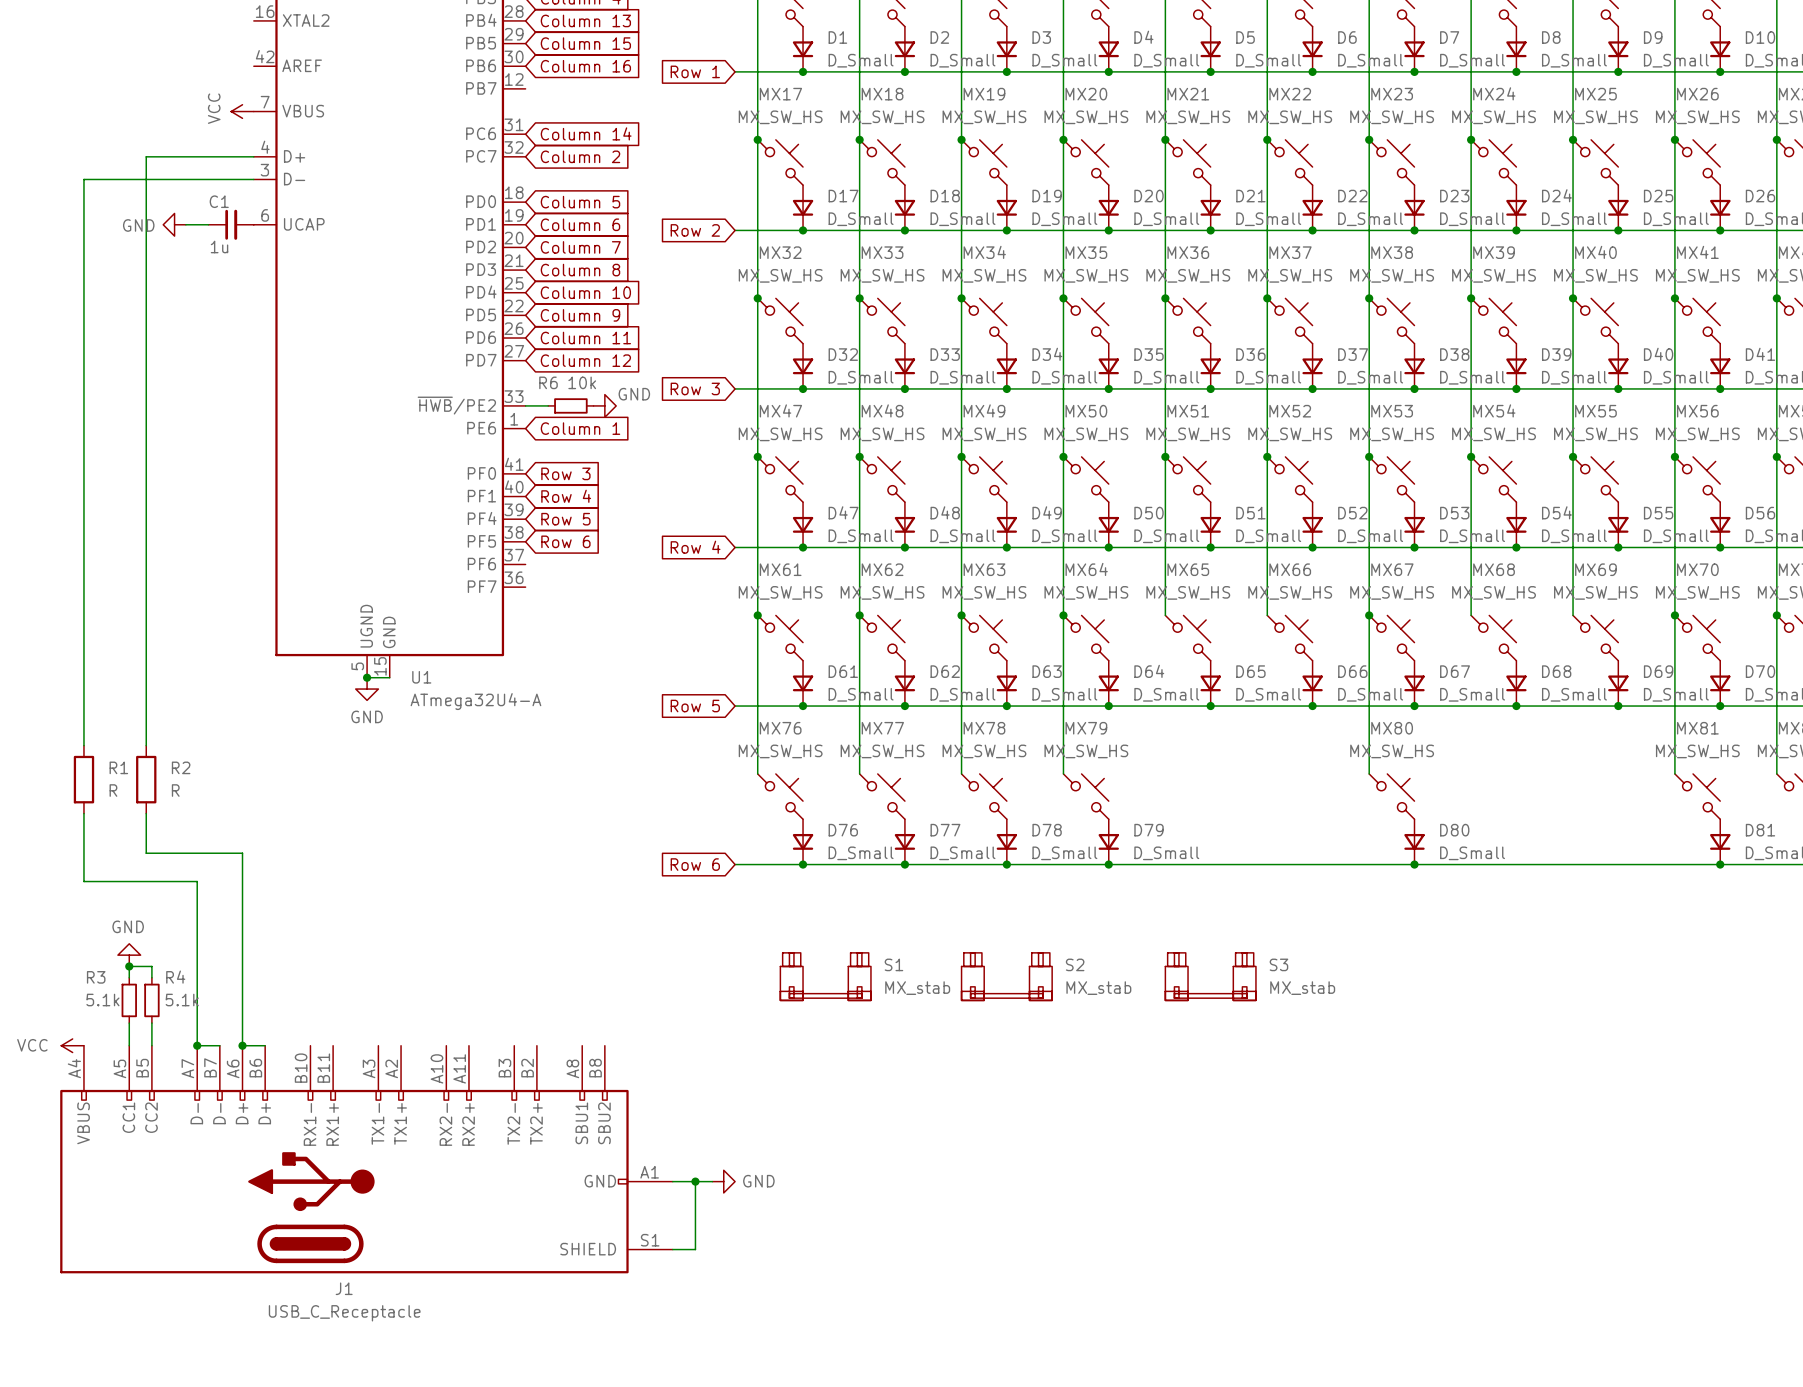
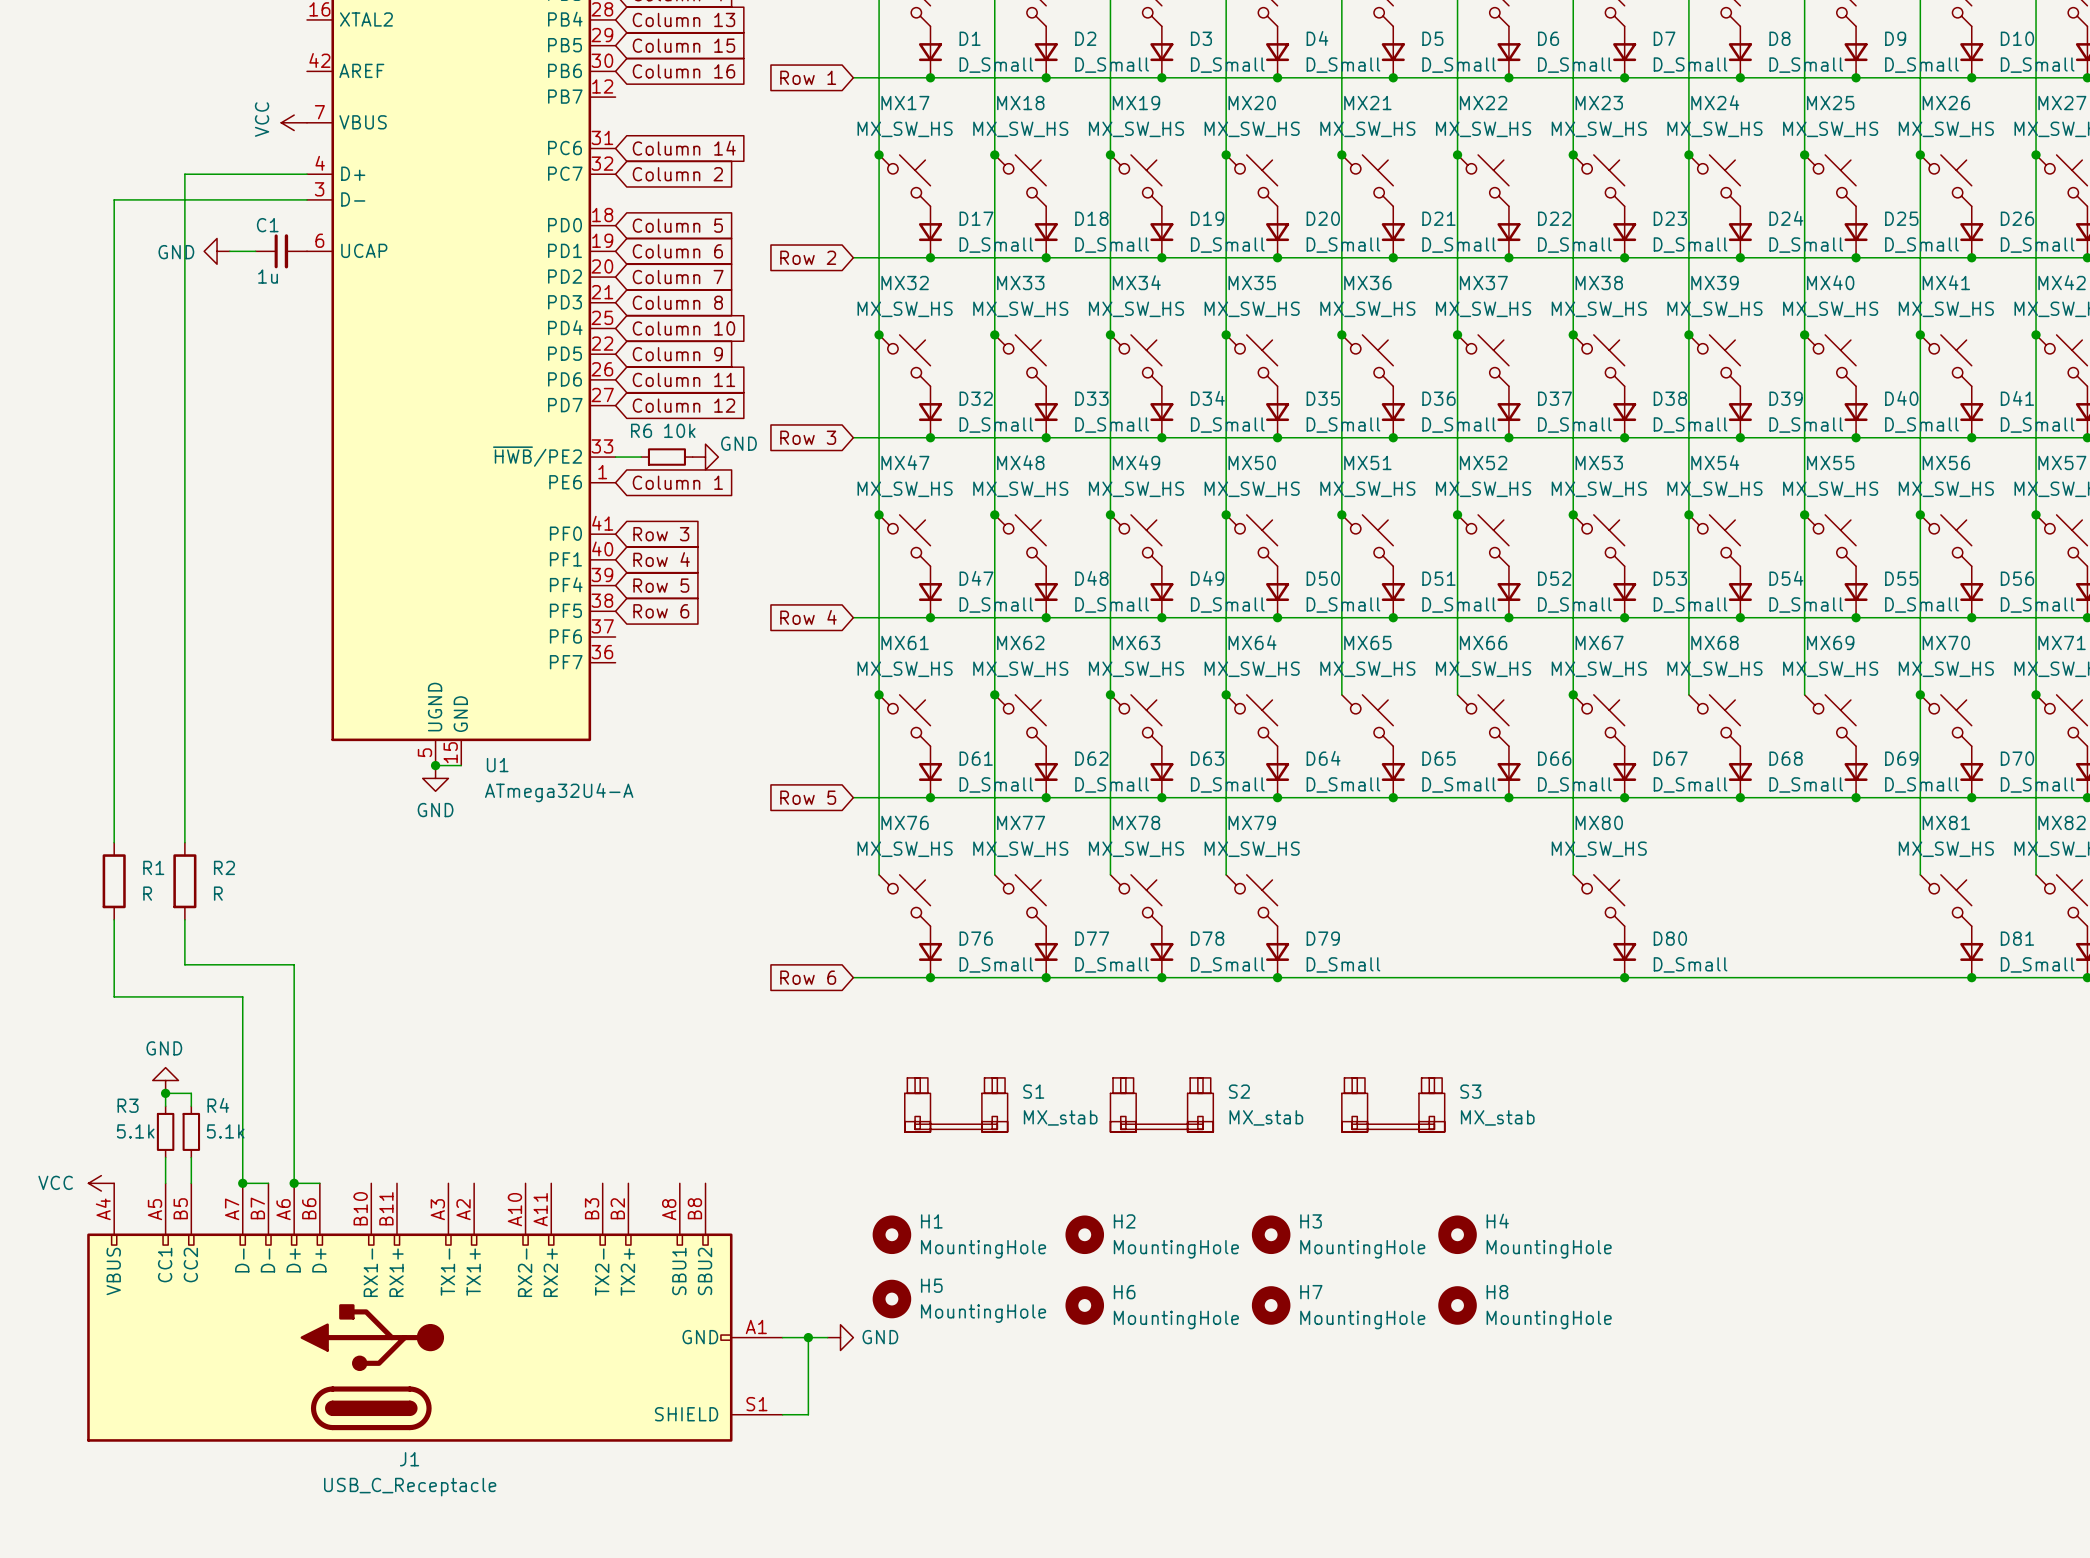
H1: none -> MountingHole (891, 1234)
H2: none -> MountingHole (1084, 1234)
H3: none -> MountingHole (1271, 1234)
H4: none -> MountingHole (1457, 1234)
H5: none -> MountingHole (891, 1299)
H6: none -> MountingHole (1084, 1305)
H7: none -> MountingHole (1271, 1305)
H8: none -> MountingHole (1457, 1305)

